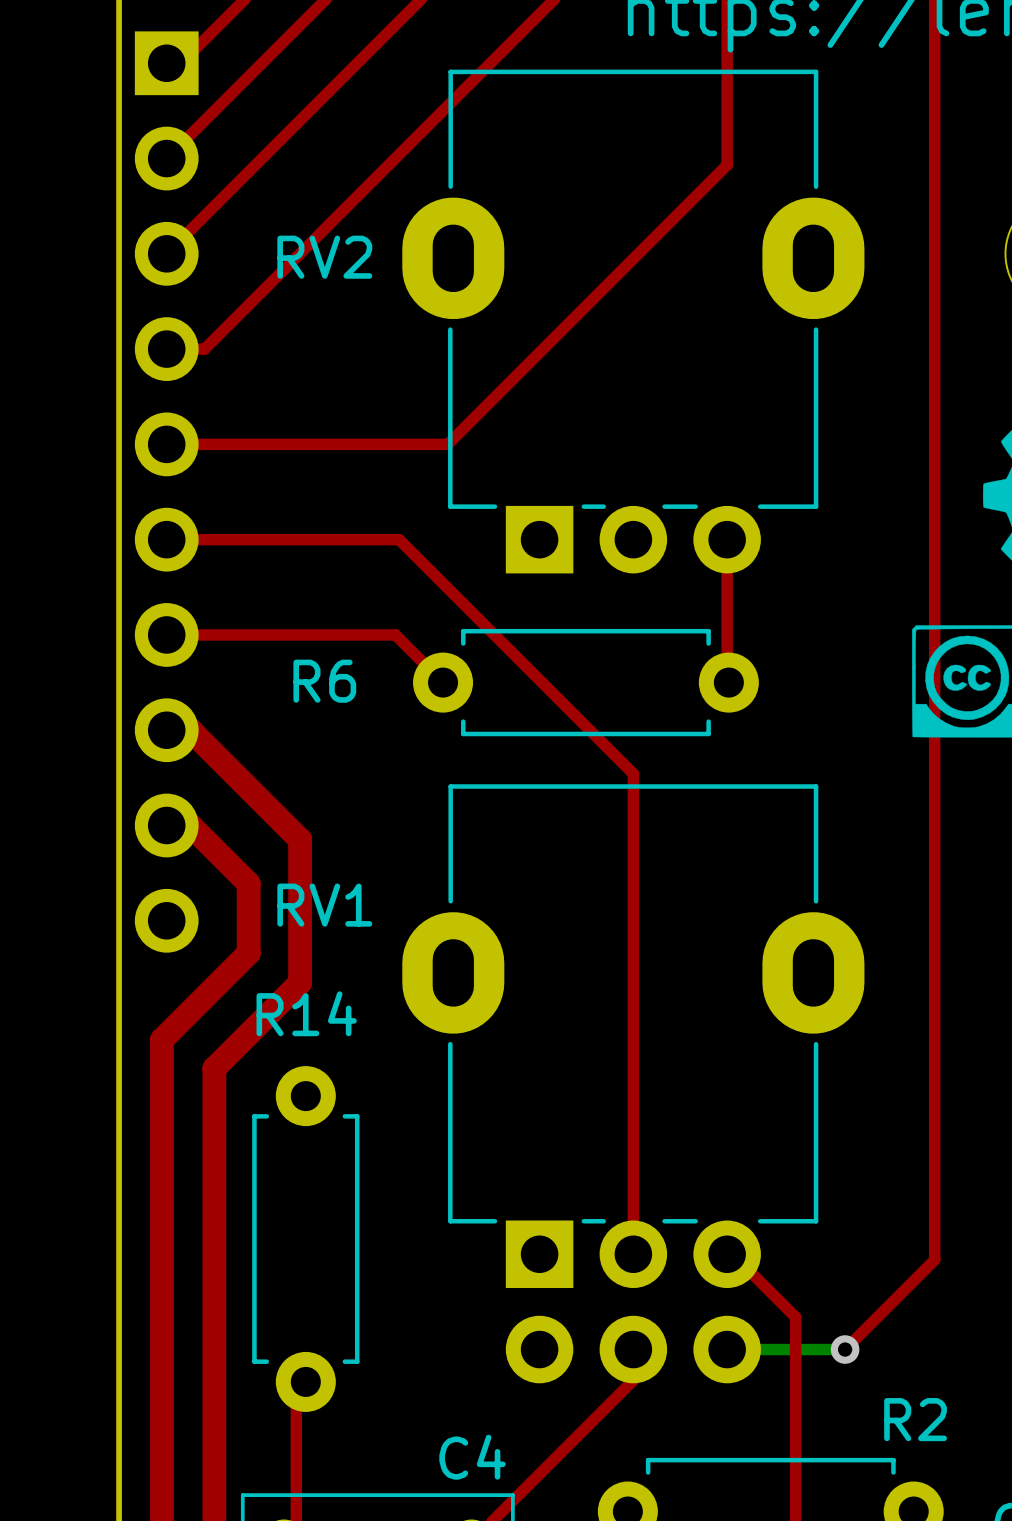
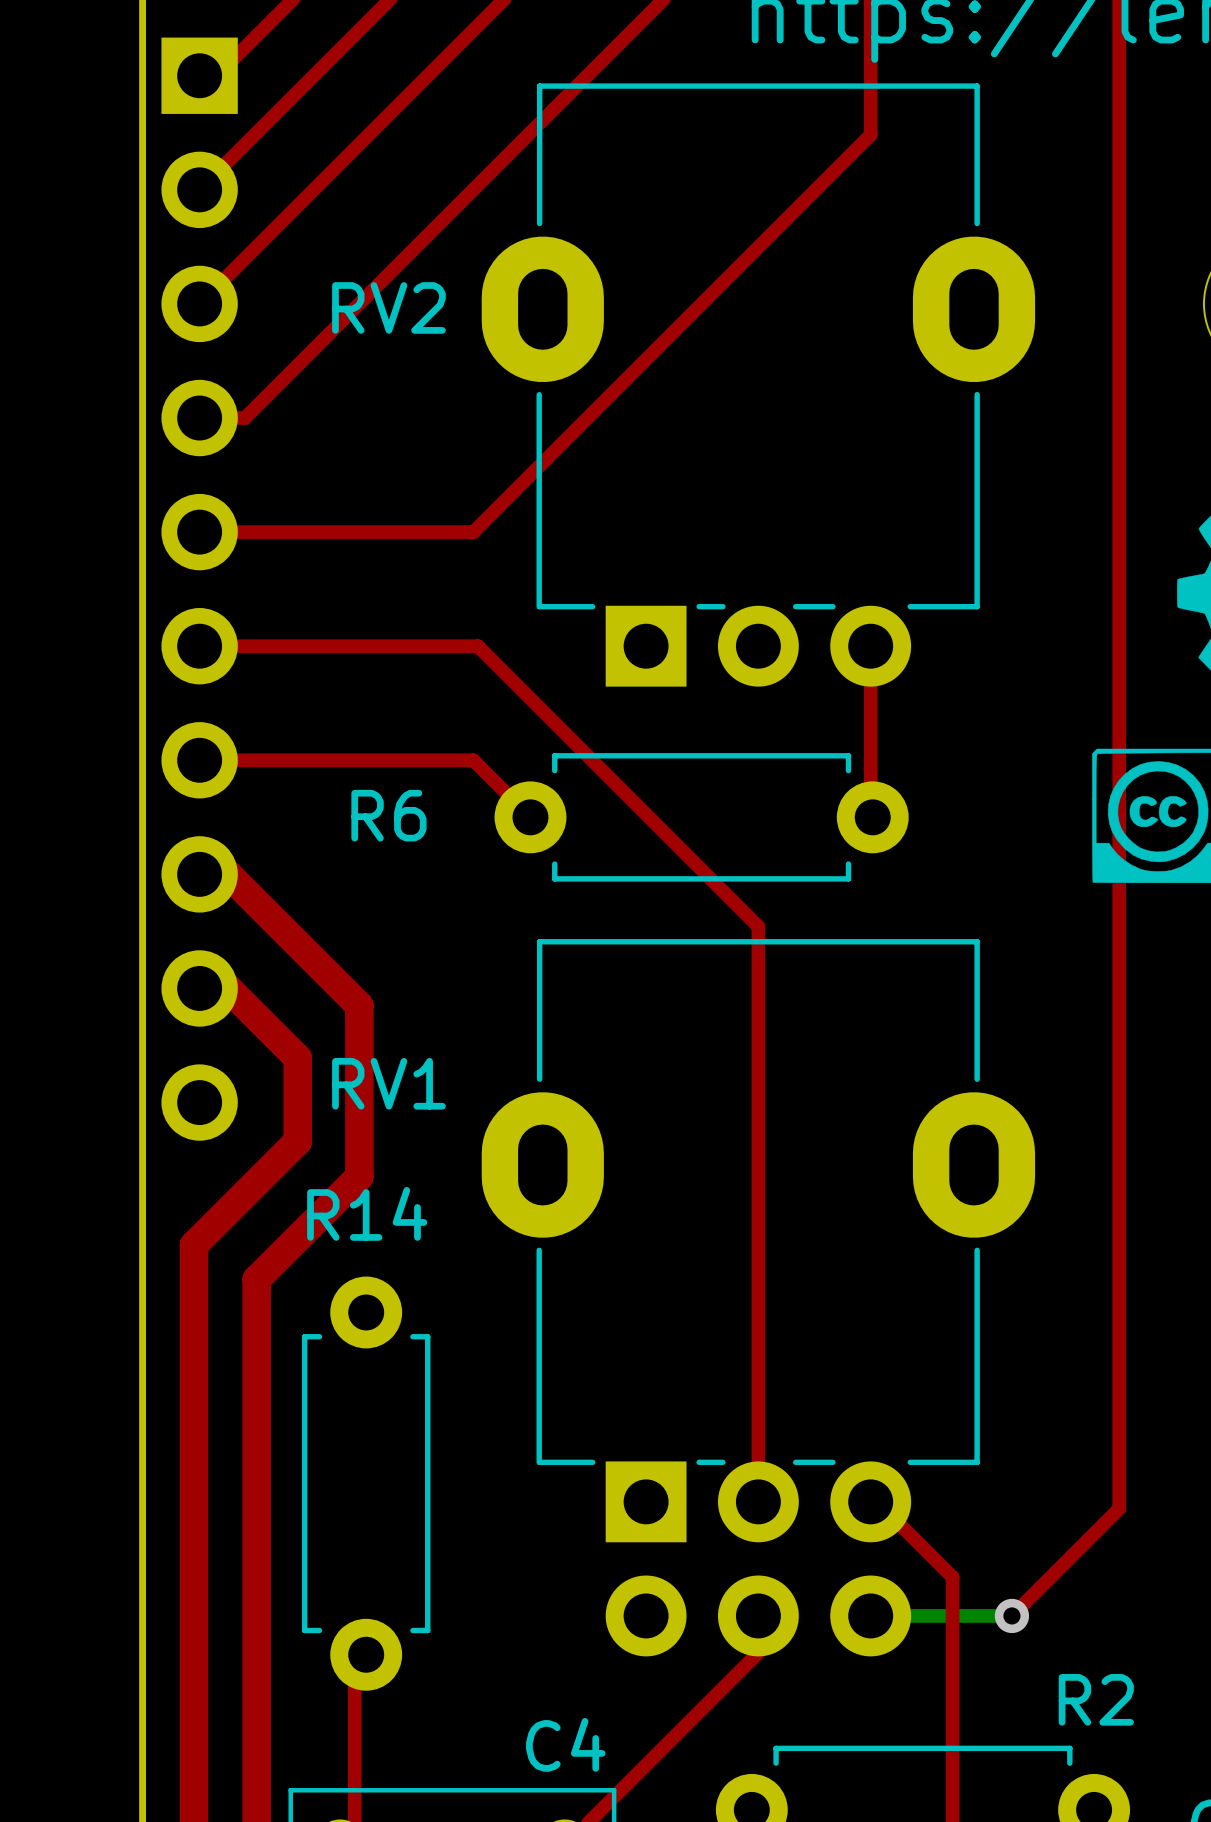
top track: (727, 112) (727, 165) (447, 444) (395, 444) -> (870, 134) (473, 532)

